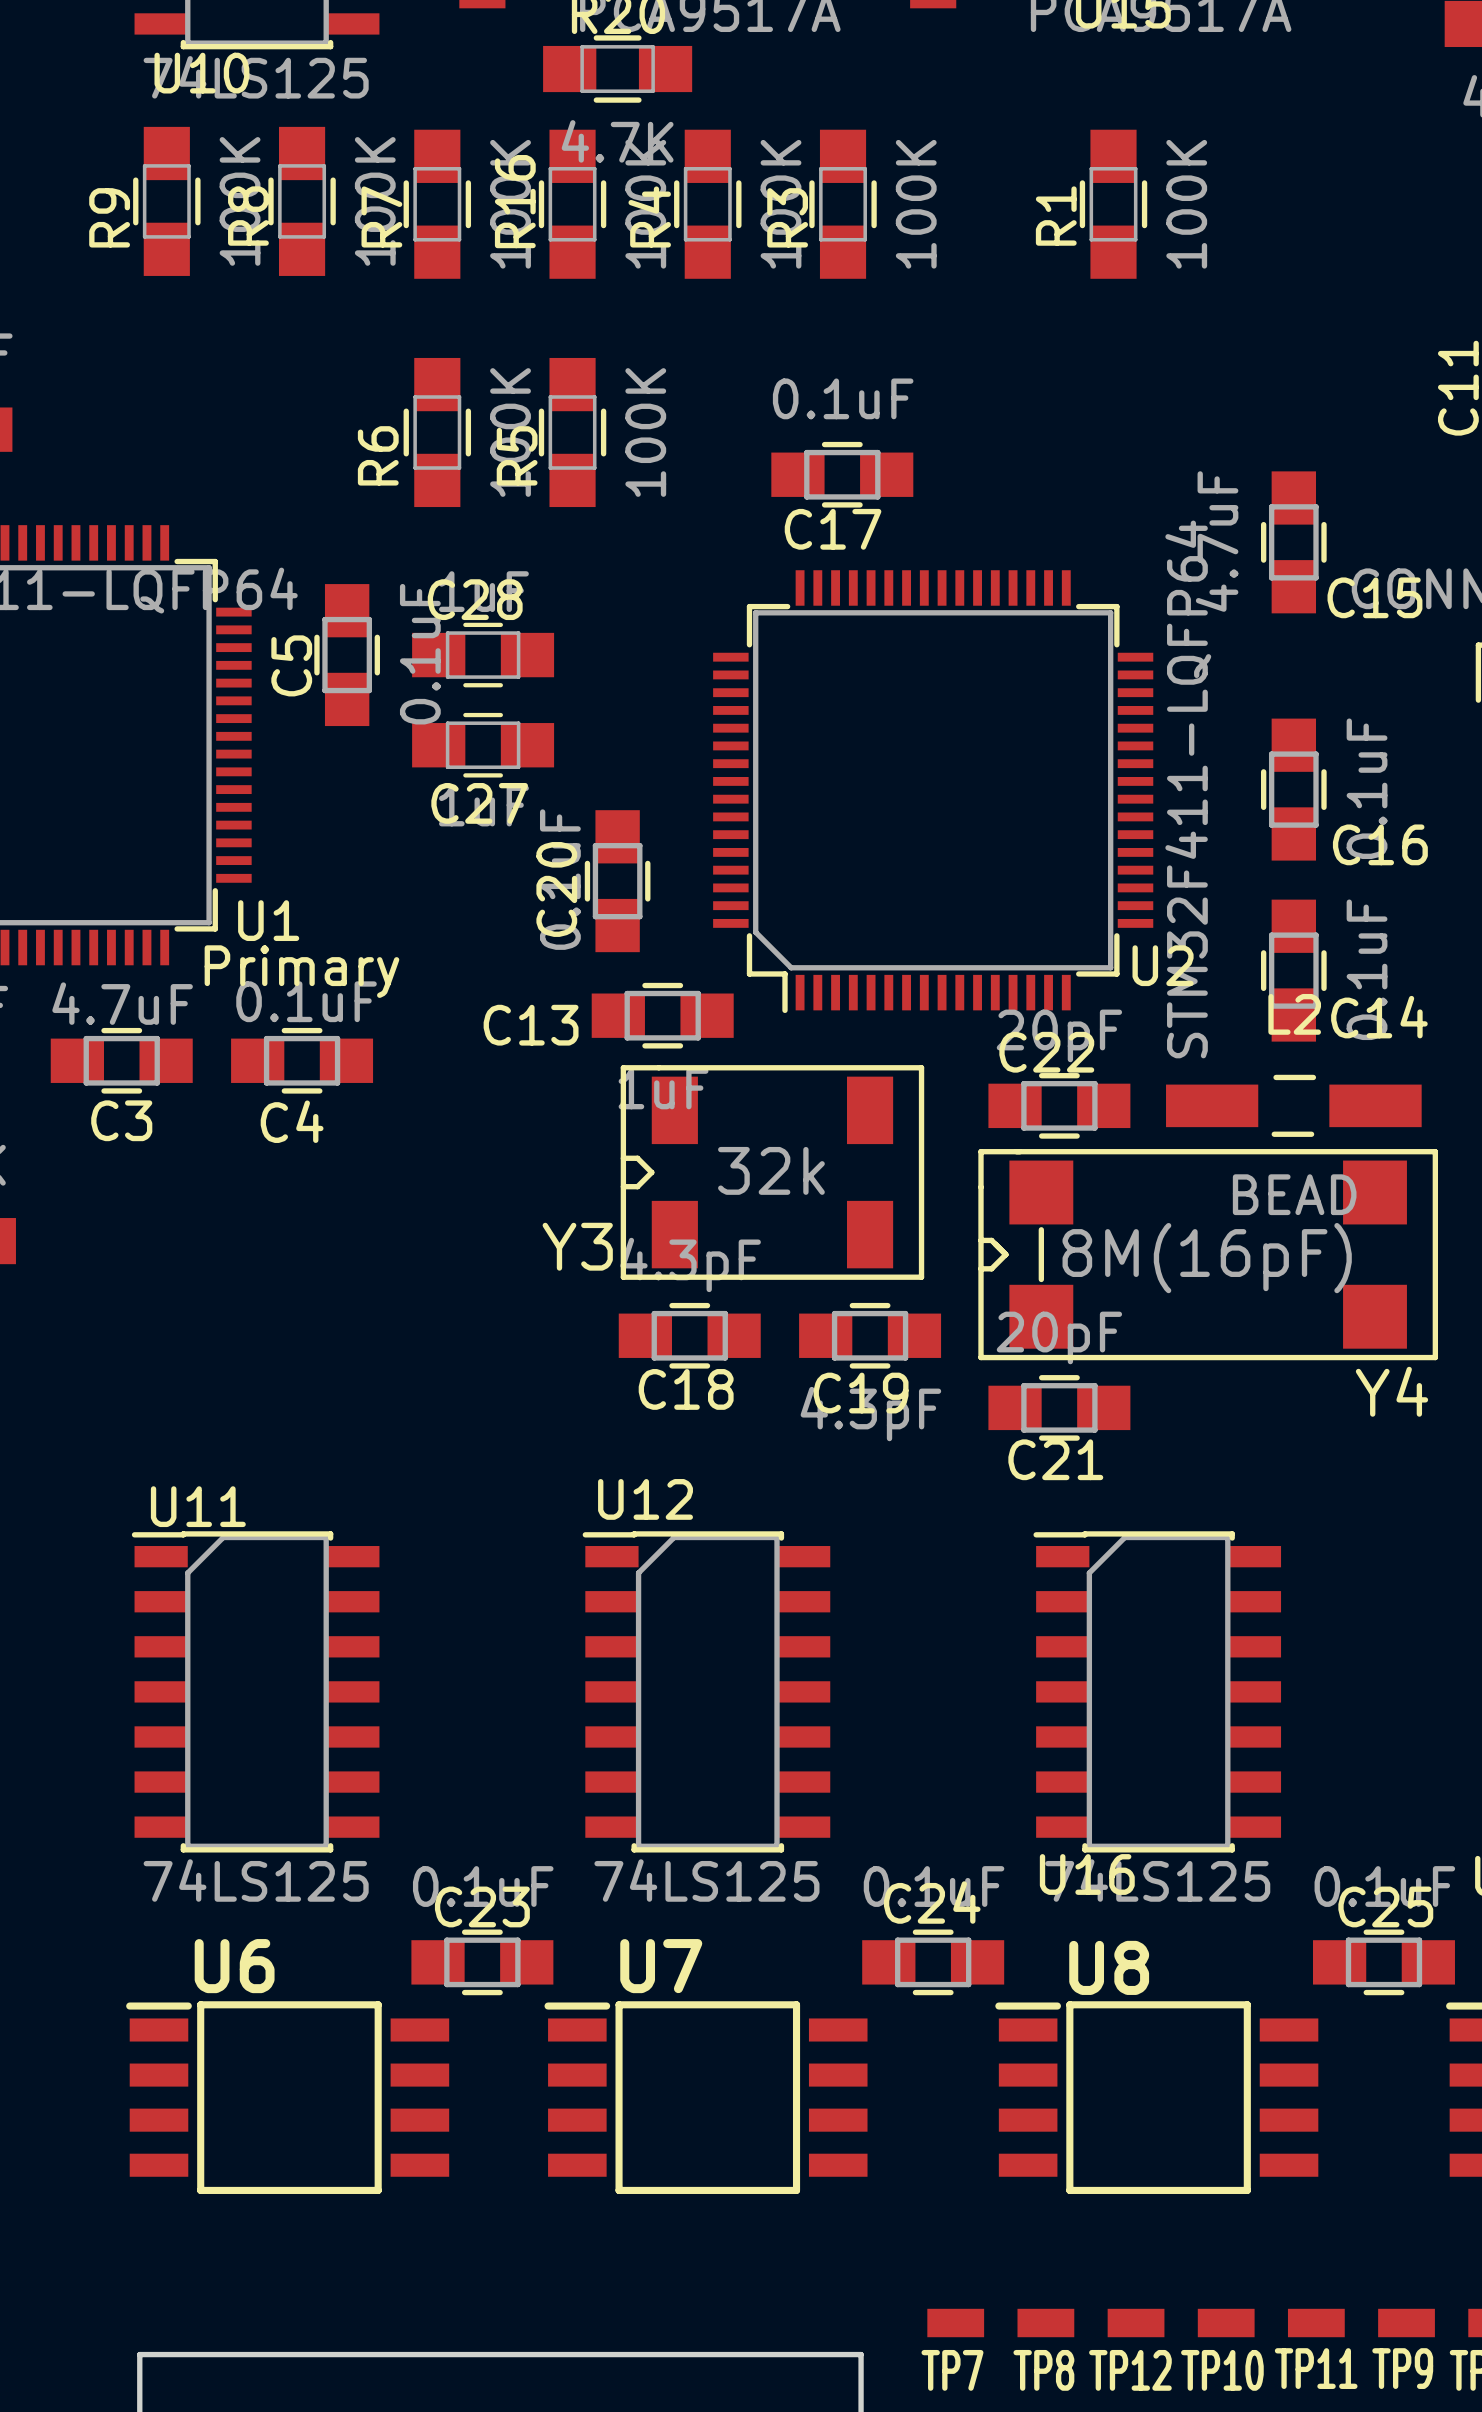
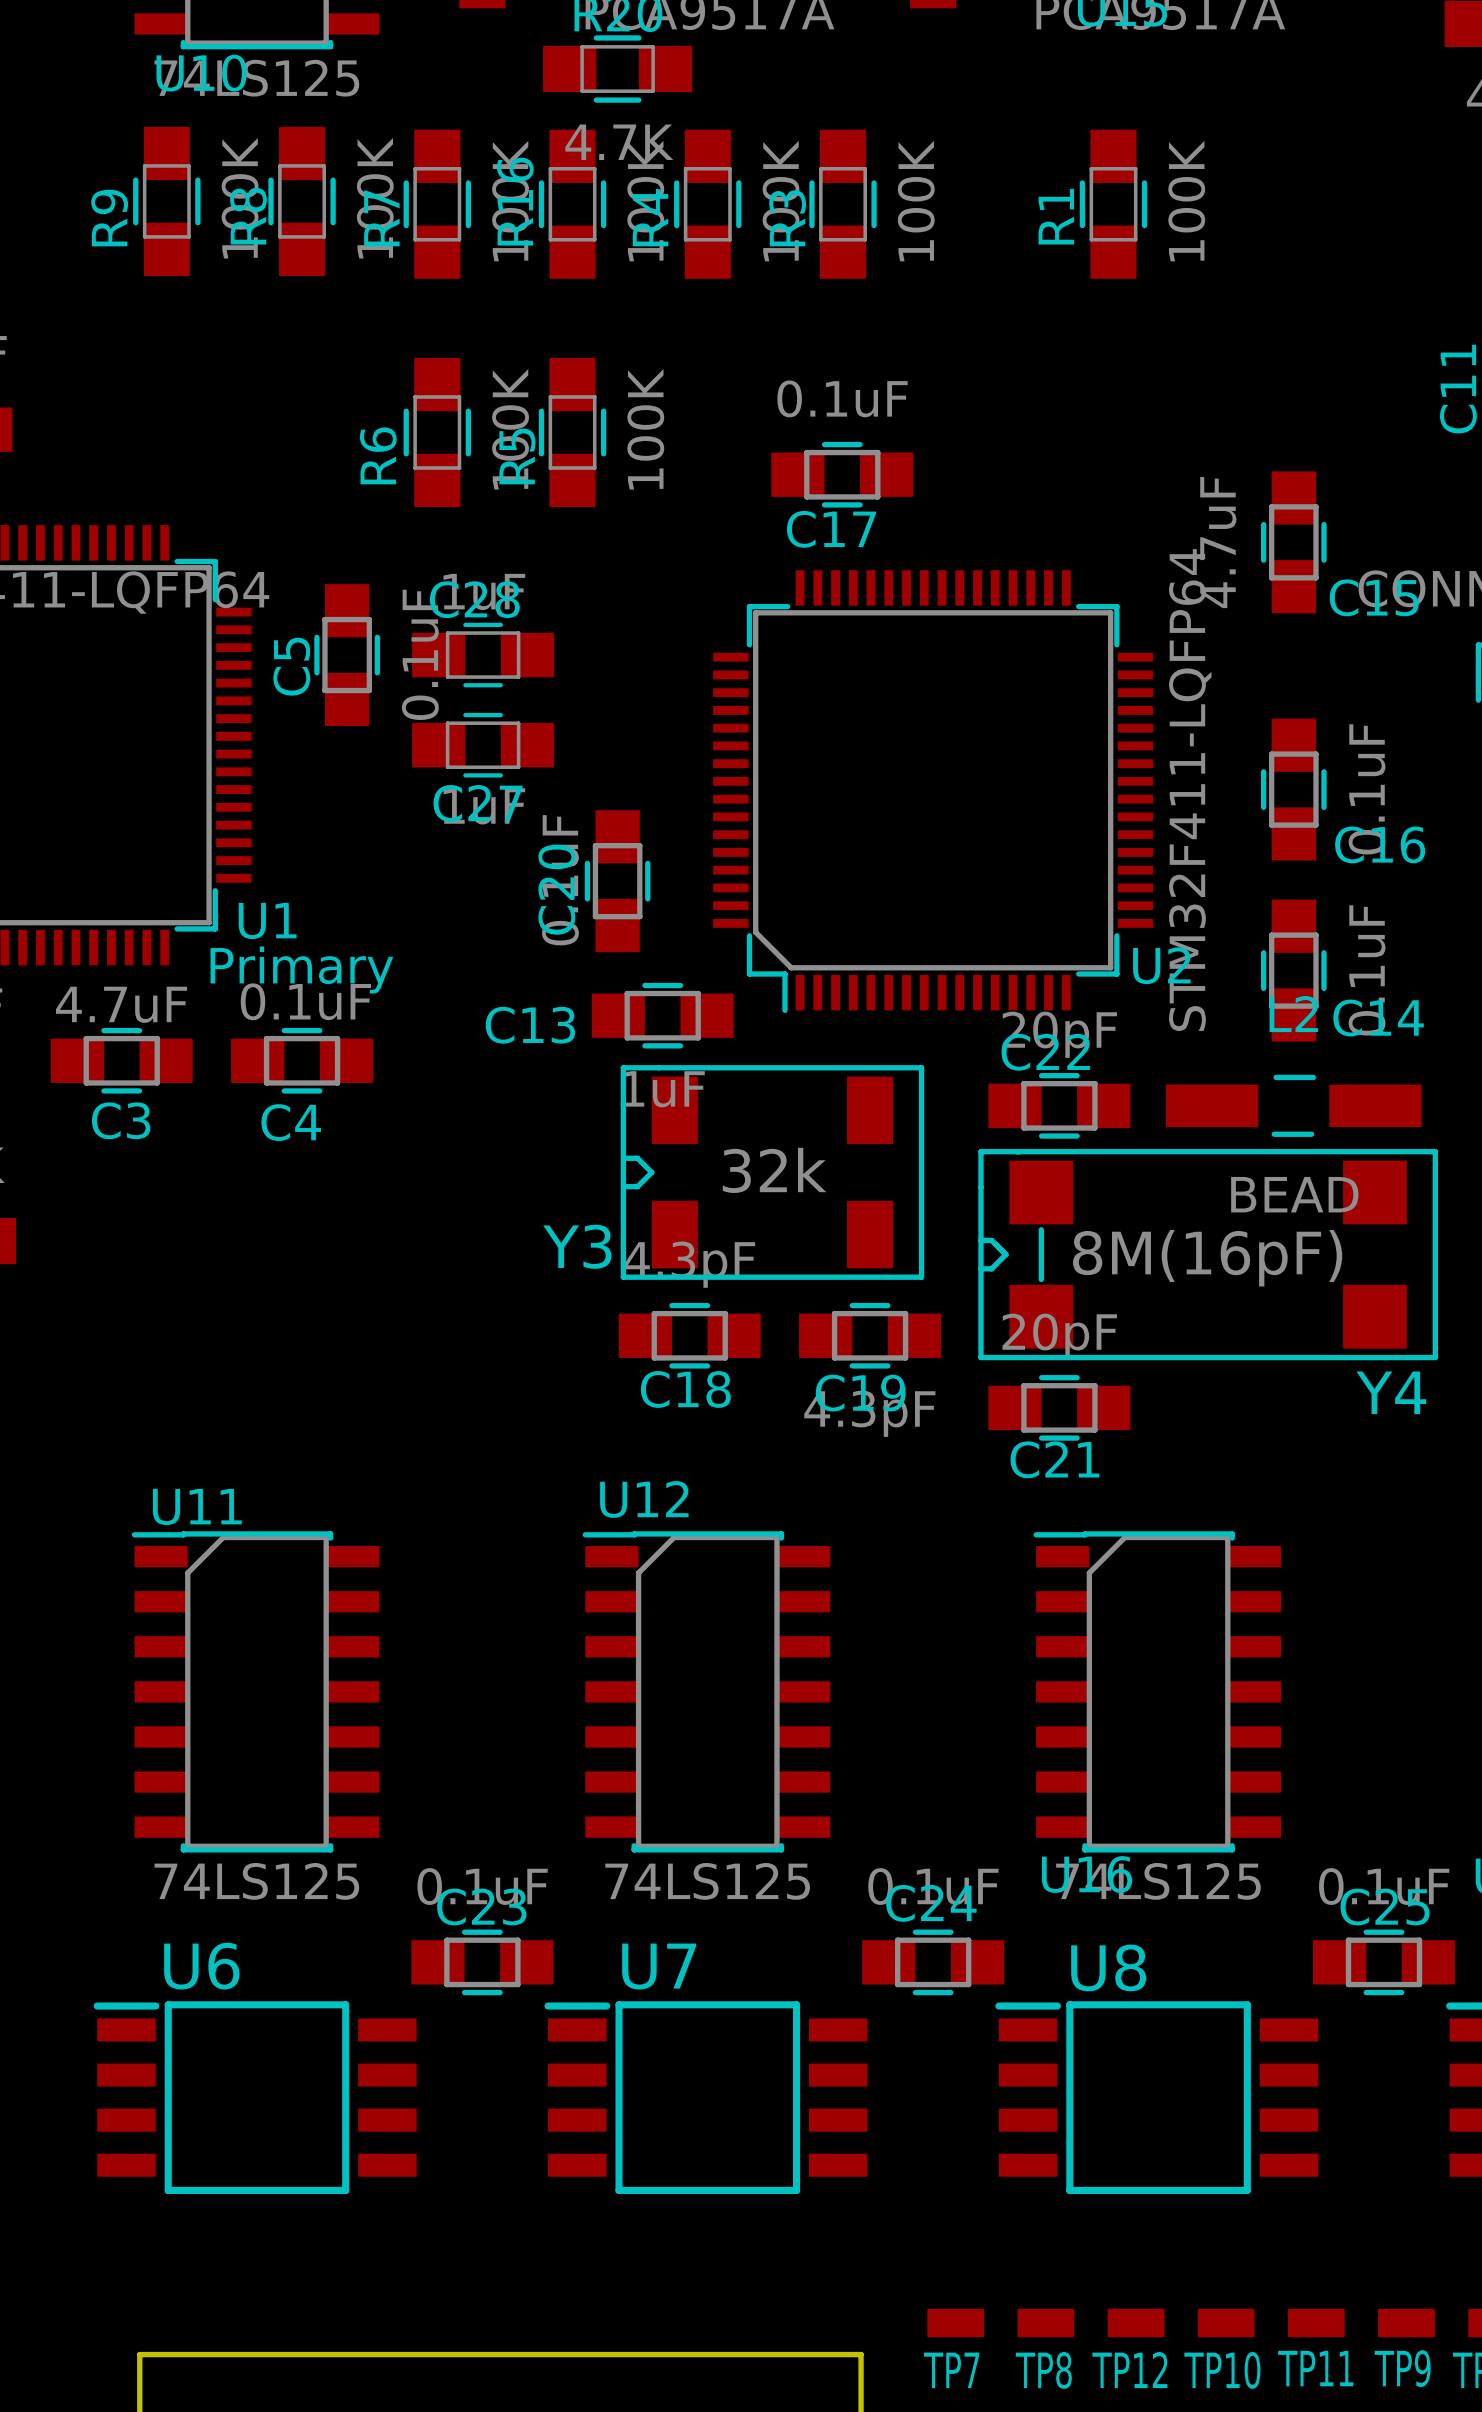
U6 position: (287, 2097) -> (255, 2097)

